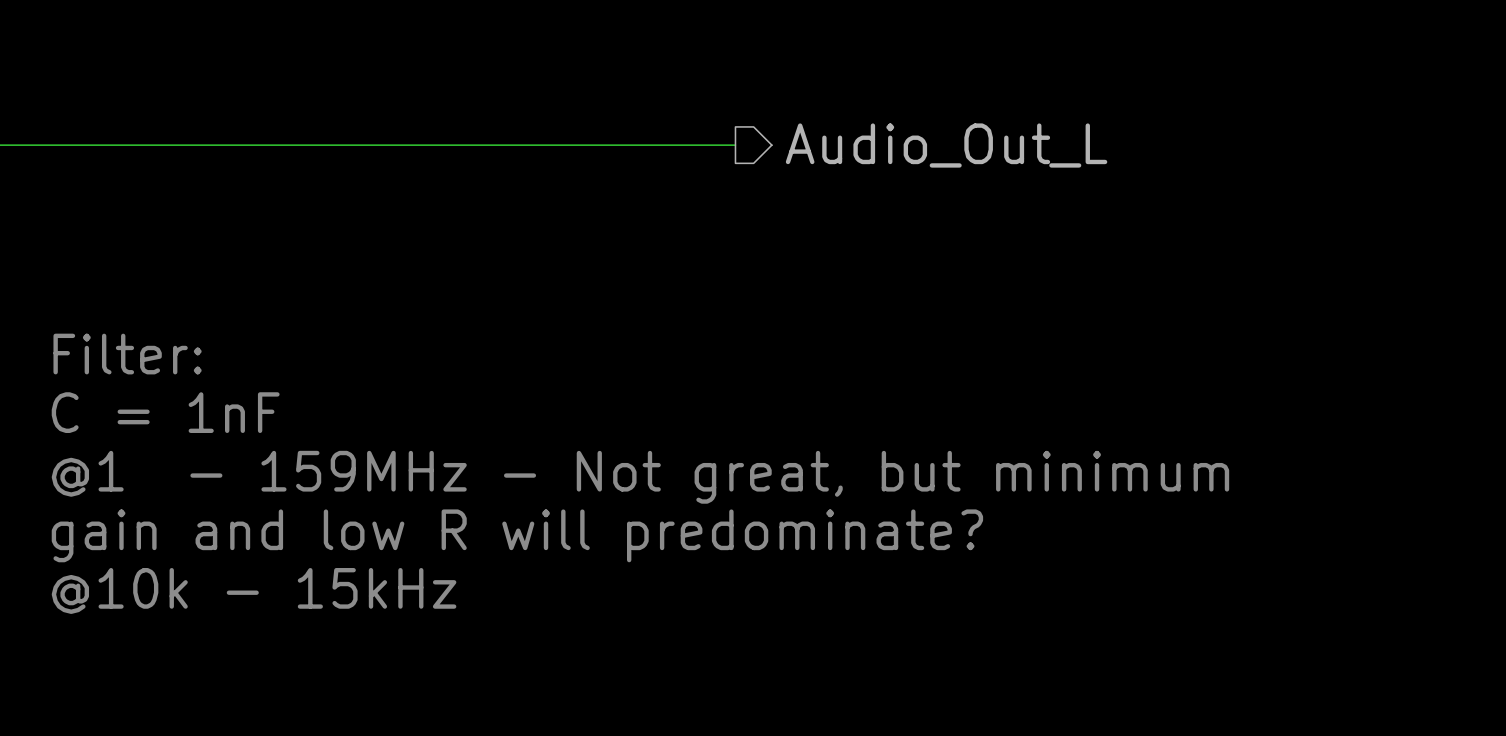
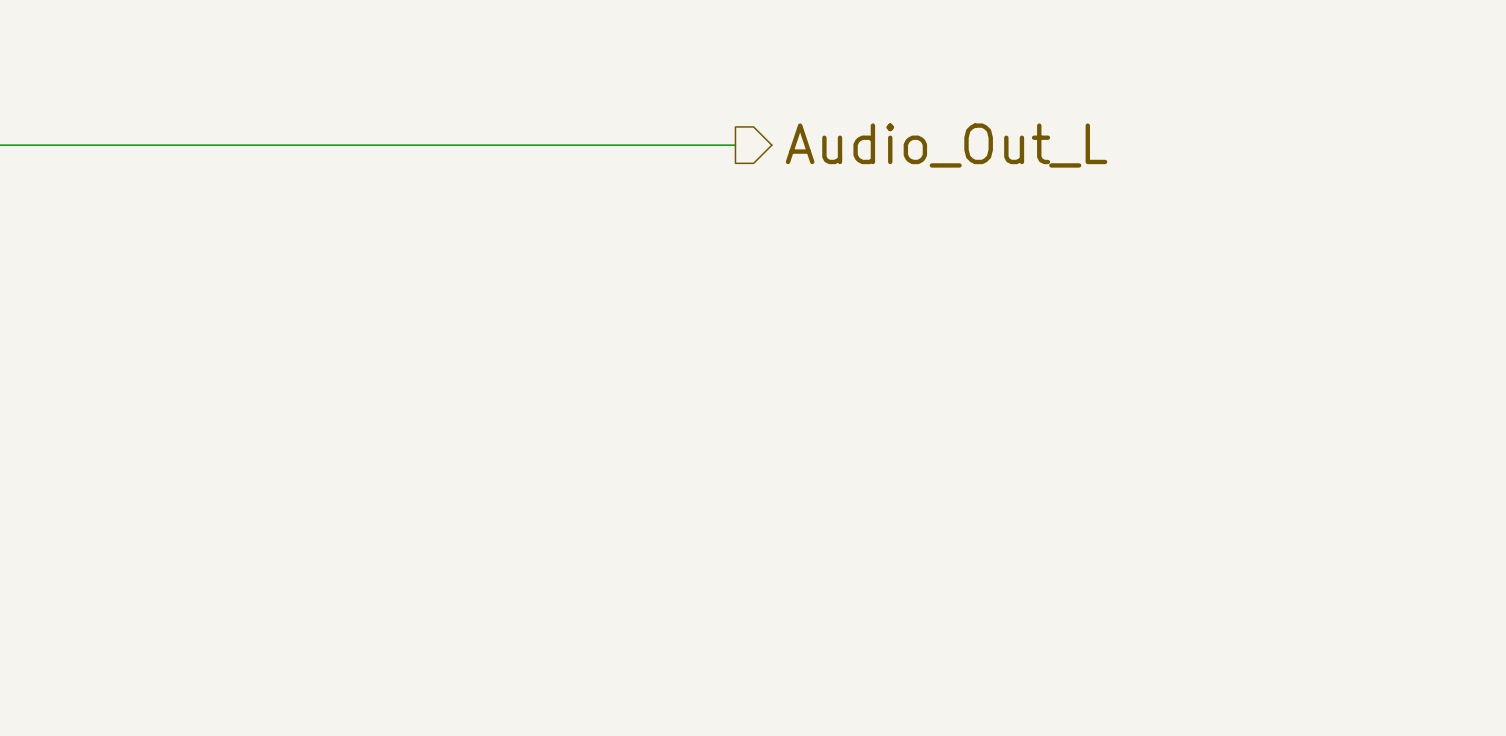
text: Filter: (127, 354) -> none
text: C = 1nF (165, 412) -> none
text: @1 - 159MHz - Not great, but minimum (640, 477) -> none
text: gain and low R will predominate? (517, 535) -> none
text: @10k - 15kHz (254, 590) -> none

